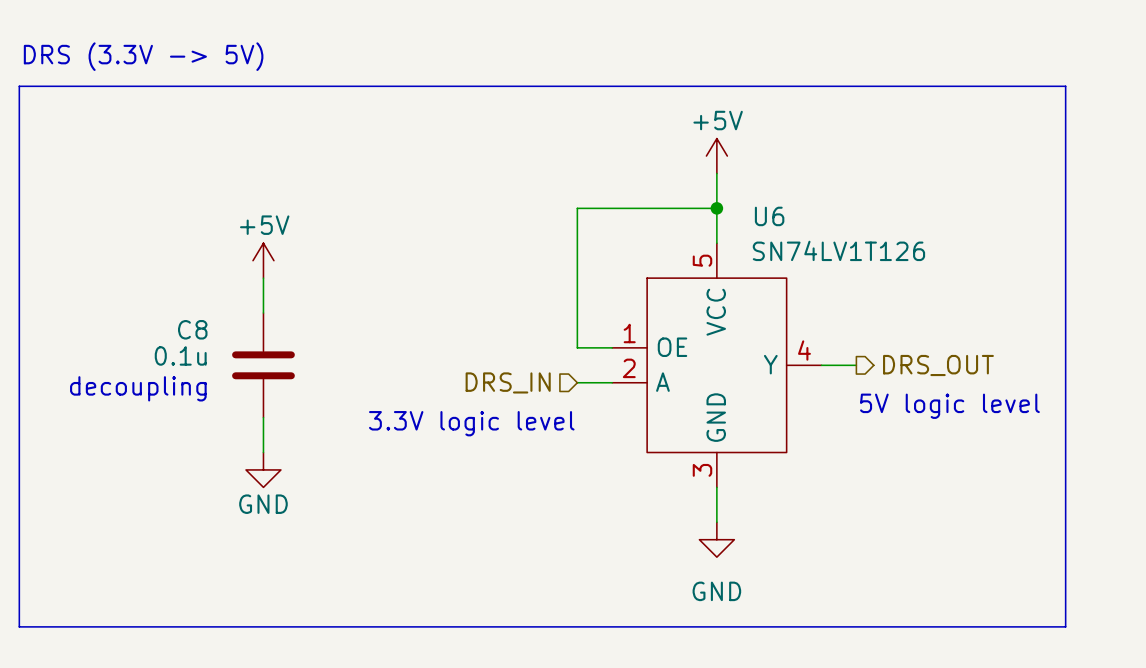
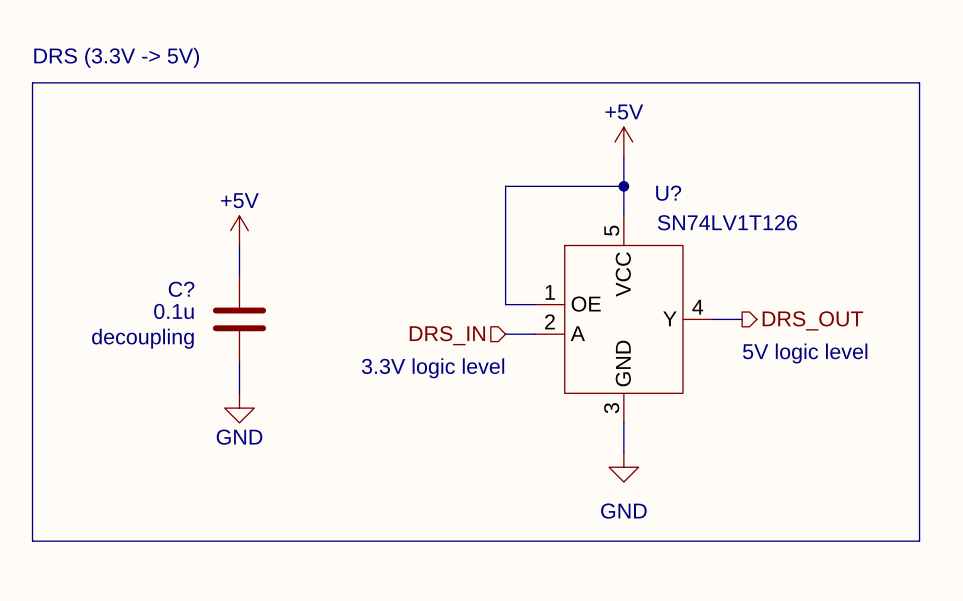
U6 name: U6 (769, 216) -> U? (668, 193)
C8 name: C8 (192, 329) -> C? (181, 289)

